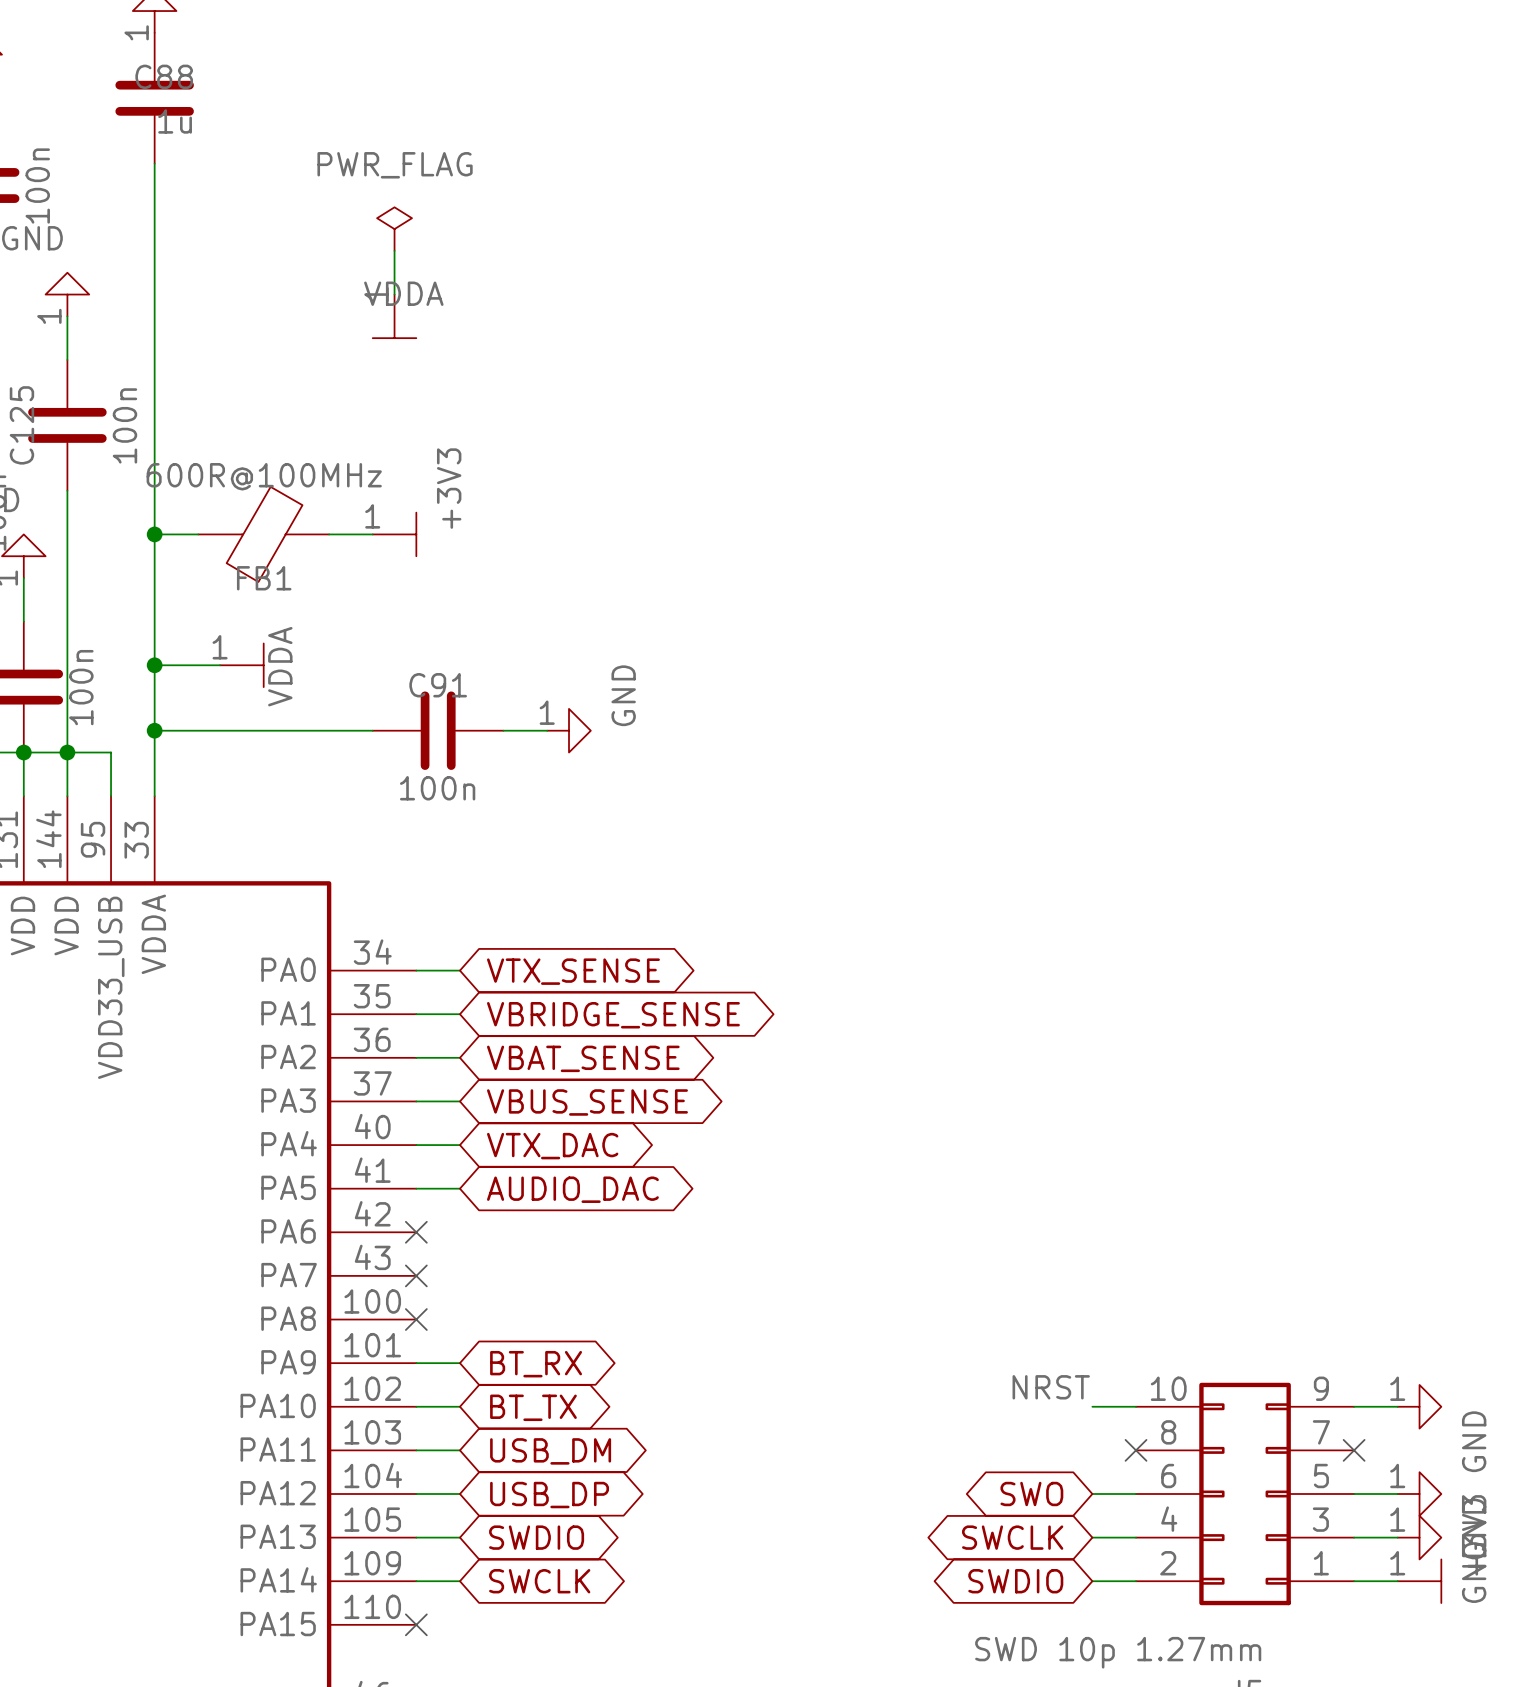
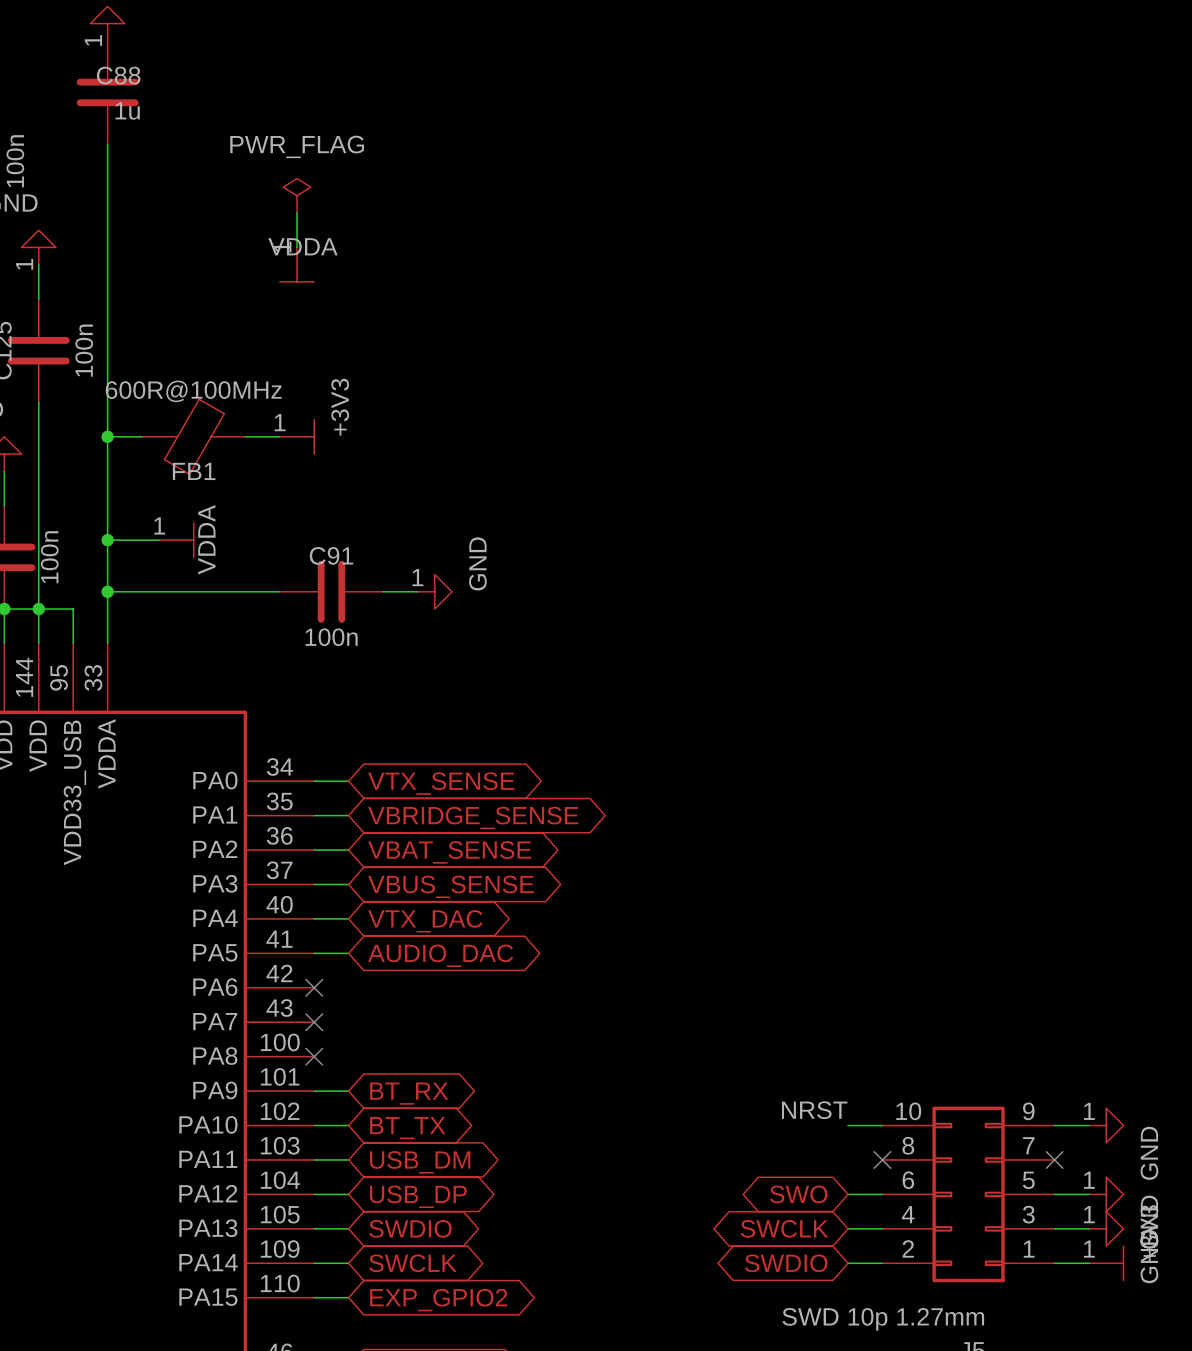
wire: none -> (314, 1297) (348, 1297)
no-connect mark: (416, 1624) -> none
global label: none -> EXP_GPIO2 (438, 1300)

